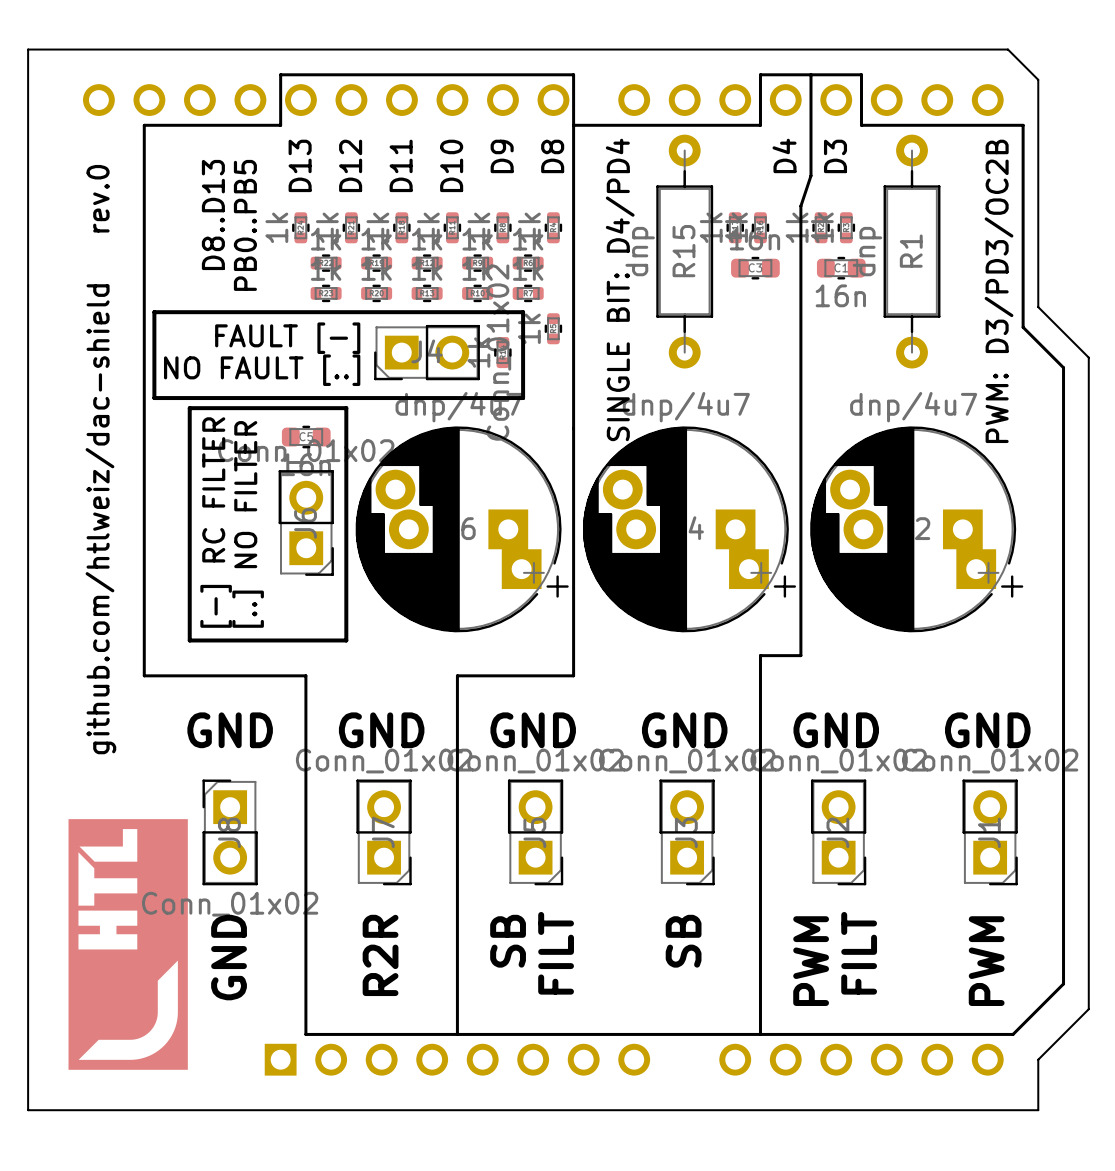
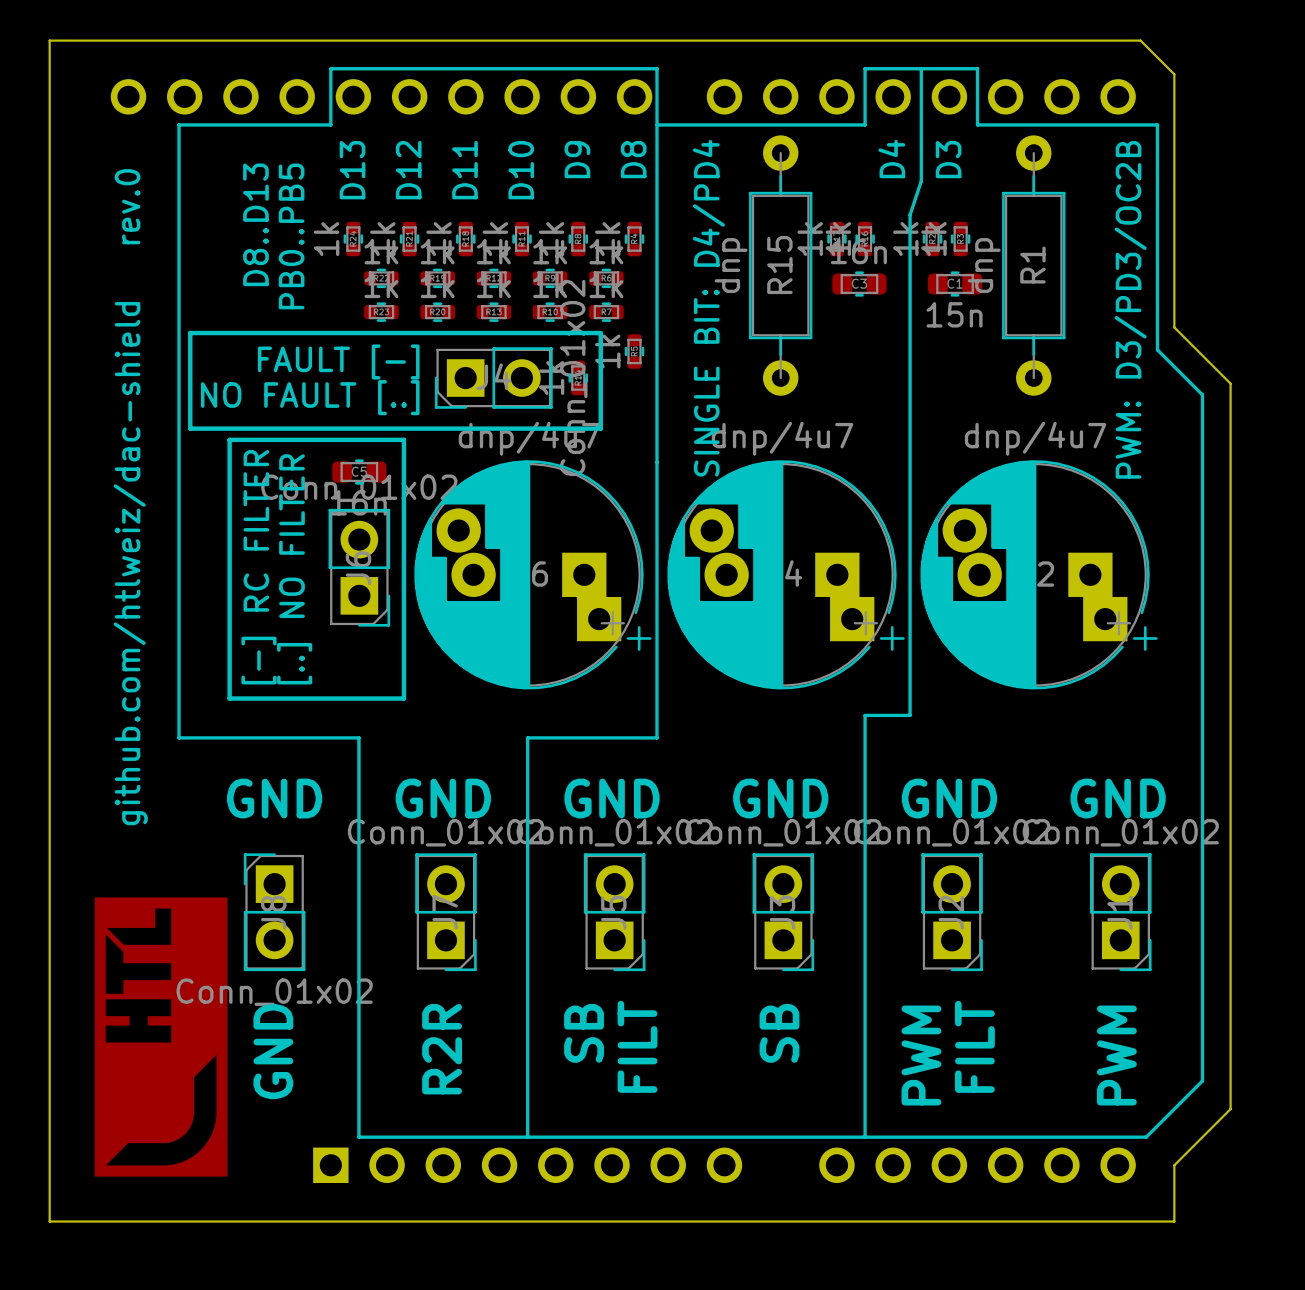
C1 value: 16n (840, 295) -> 15n (954, 314)

